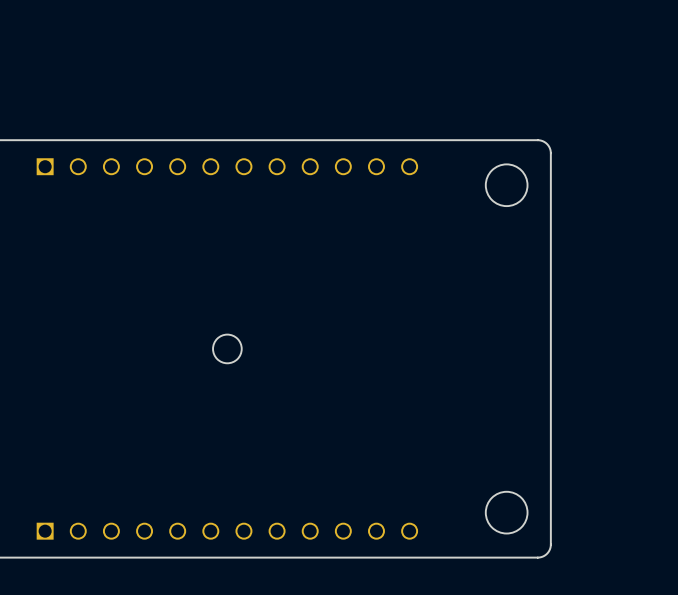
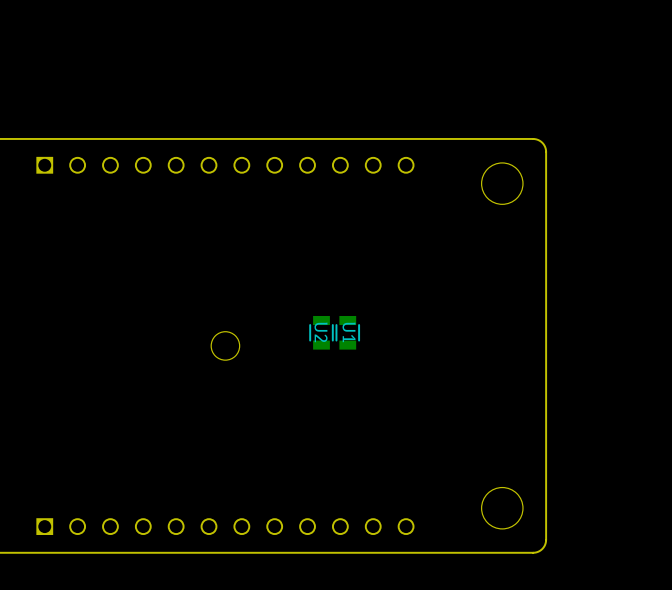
U1: none -> (321, 332)
U2: none -> (347, 332)

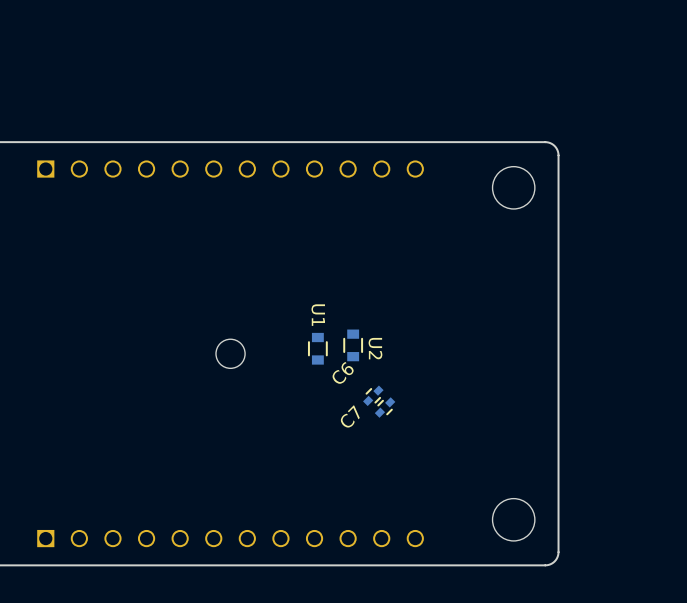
U1 footprint: [309, 315, 334, 350] -> [307, 332, 328, 365]
U2 footprint: [335, 315, 361, 350] -> [343, 329, 364, 362]
U2 name position: U2 (321, 332) -> U2 (375, 348)
U1 name position: U1 (349, 332) -> U1 (318, 315)
C7: none -> (373, 395)
C6: none -> (385, 407)

